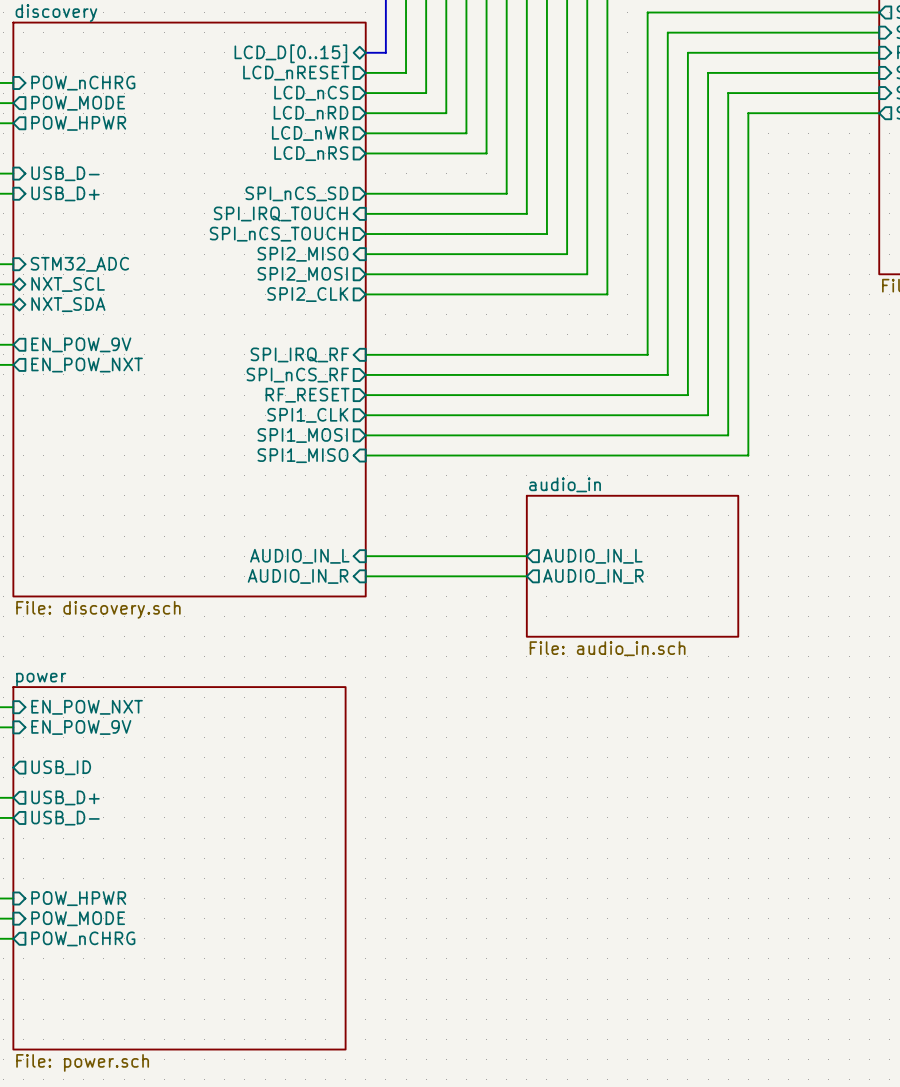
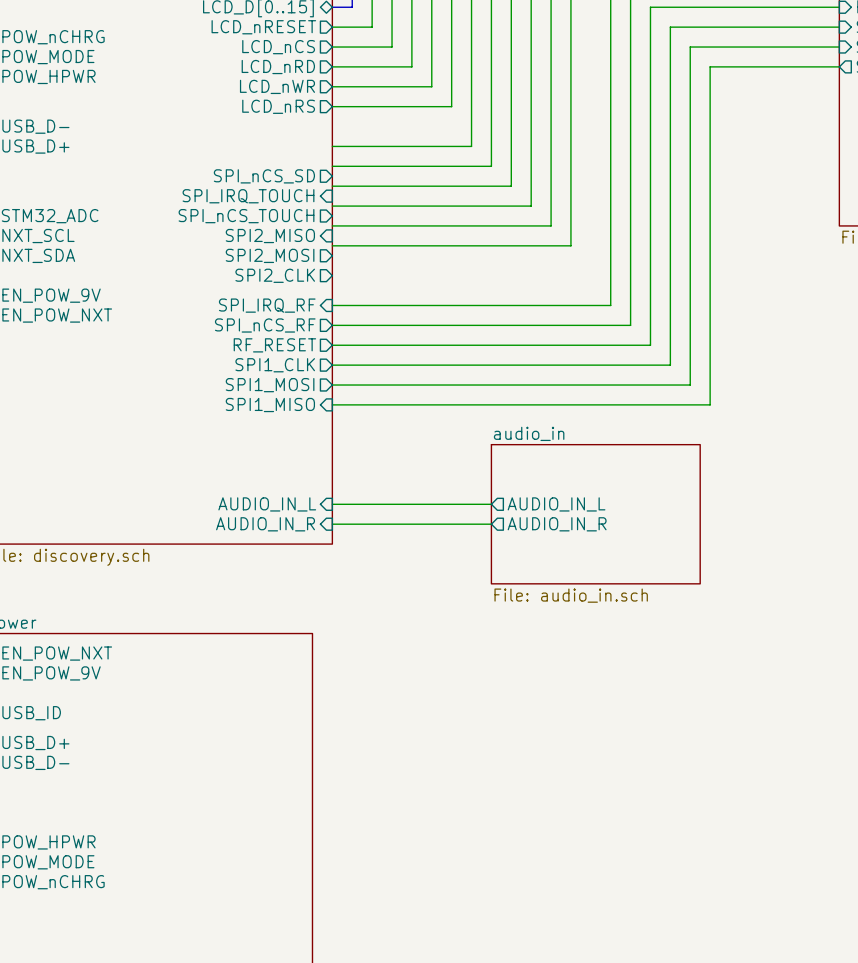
sheet pin position: SPI_nCS_SD (296, 193) -> SPI_nCS_SD (264, 176)
sheet pin position: SPI_IRQ_TOUCH (280, 214) -> SPI_IRQ_TOUCH (248, 196)
sheet pin position: SPI_nCS_TOUCH (278, 234) -> SPI_nCS_TOUCH (246, 216)
sheet pin position: SPI2_MISO (302, 254) -> SPI2_MISO (270, 236)
sheet pin position: SPI2_MOSI (302, 274) -> SPI2_MOSI (270, 255)
sheet pin position: SPI2_CLK (307, 294) -> SPI2_CLK (275, 275)

